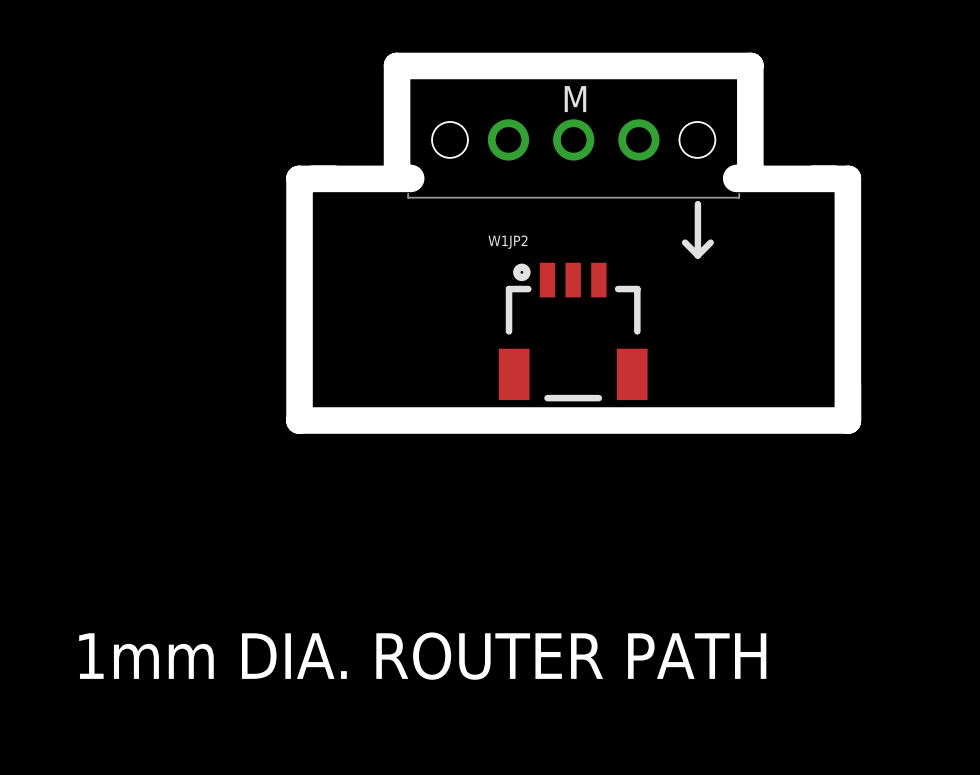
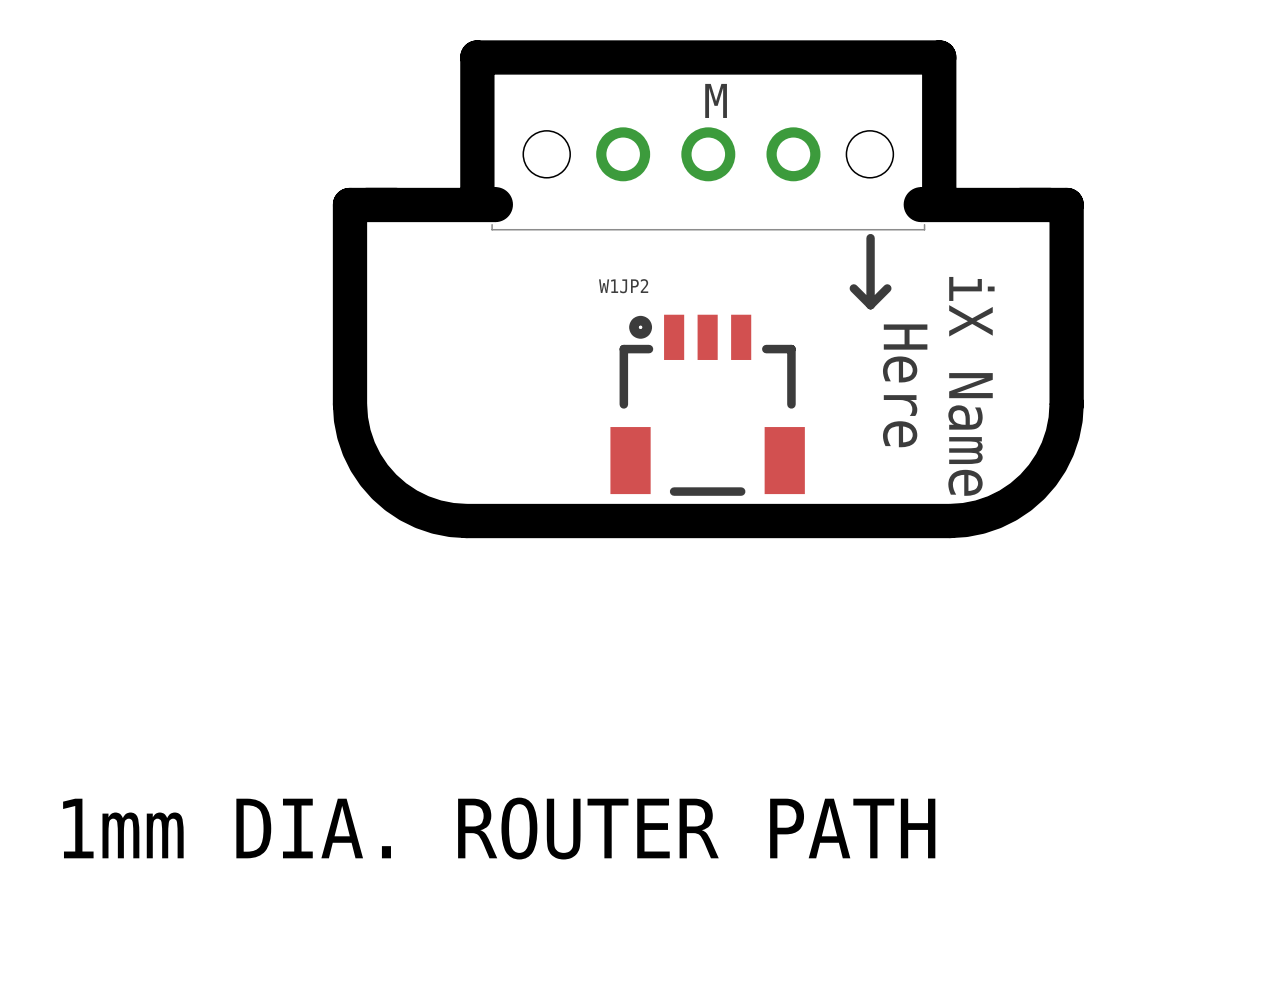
text: none -> Here (905, 385)
text: none -> iX Name (971, 386)
board edge: (299, 331) (299, 420) (388, 420) -> (349, 404) (350, 419) (358, 448) (365, 462) (383, 487) (408, 505) (422, 512) (451, 520) (466, 521)
board edge: (311, 331) (311, 408) (388, 408) -> (366, 404) (369, 430) (374, 442) (387, 465) (395, 475) (405, 483) (428, 496) (440, 501) (466, 504)
board edge: (835, 331) (835, 408) (758, 408) -> (1050, 404) (1046, 430) (1042, 442) (1029, 465) (1020, 475) (1010, 483) (988, 496) (975, 501) (949, 504)
board edge: (848, 331) (848, 420) (758, 420) -> (1067, 404) (1066, 419) (1058, 448) (1051, 462) (1032, 487) (1008, 505) (994, 512) (964, 520) (949, 521)

